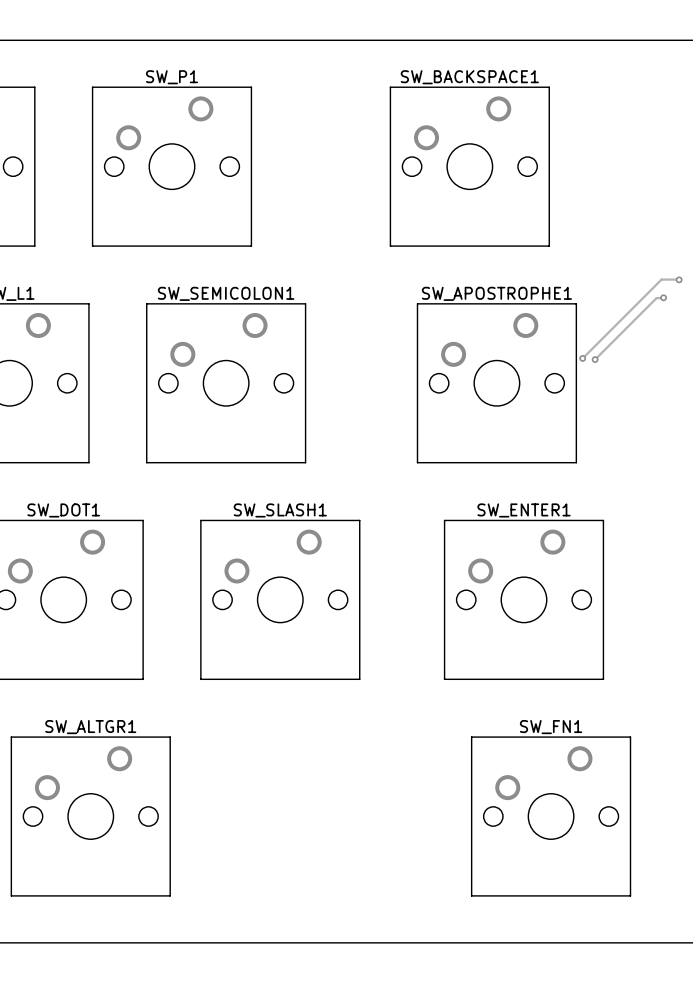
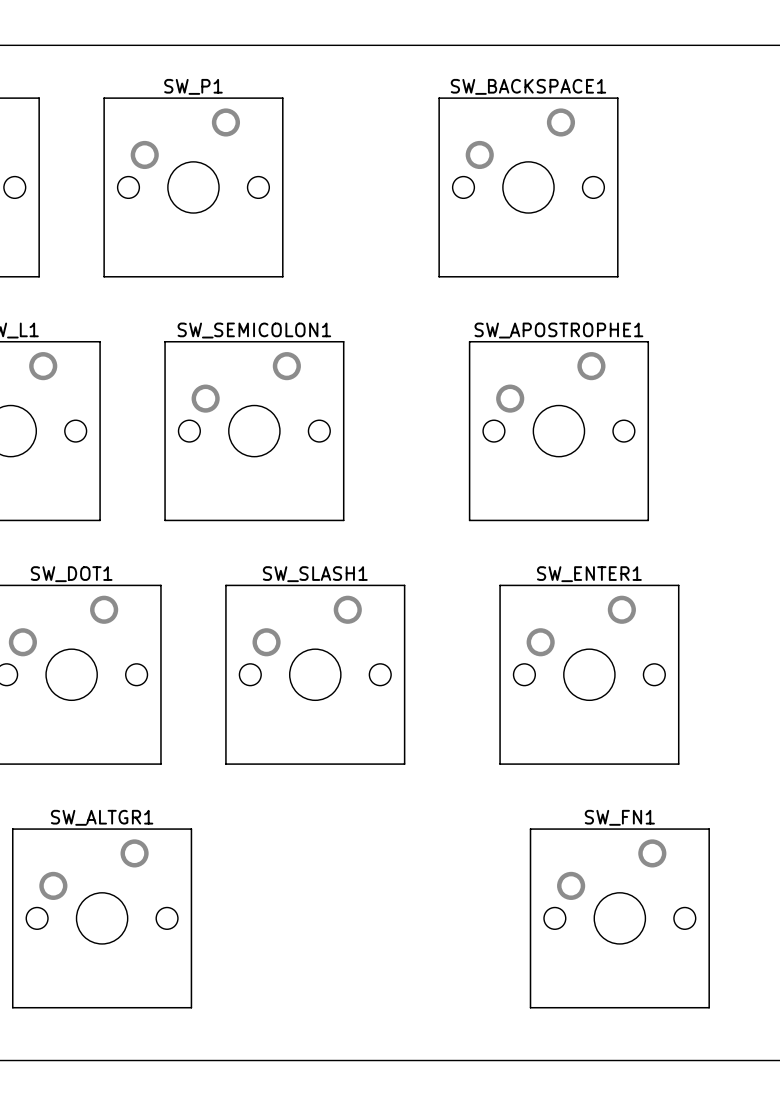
track: (678, 279) (661, 279) (582, 358) -> none
via: (679, 279) -> none
via: (663, 297) -> none
track: (663, 298) (656, 298) (595, 359) -> none
via: (582, 358) -> none
via: (595, 359) -> none

